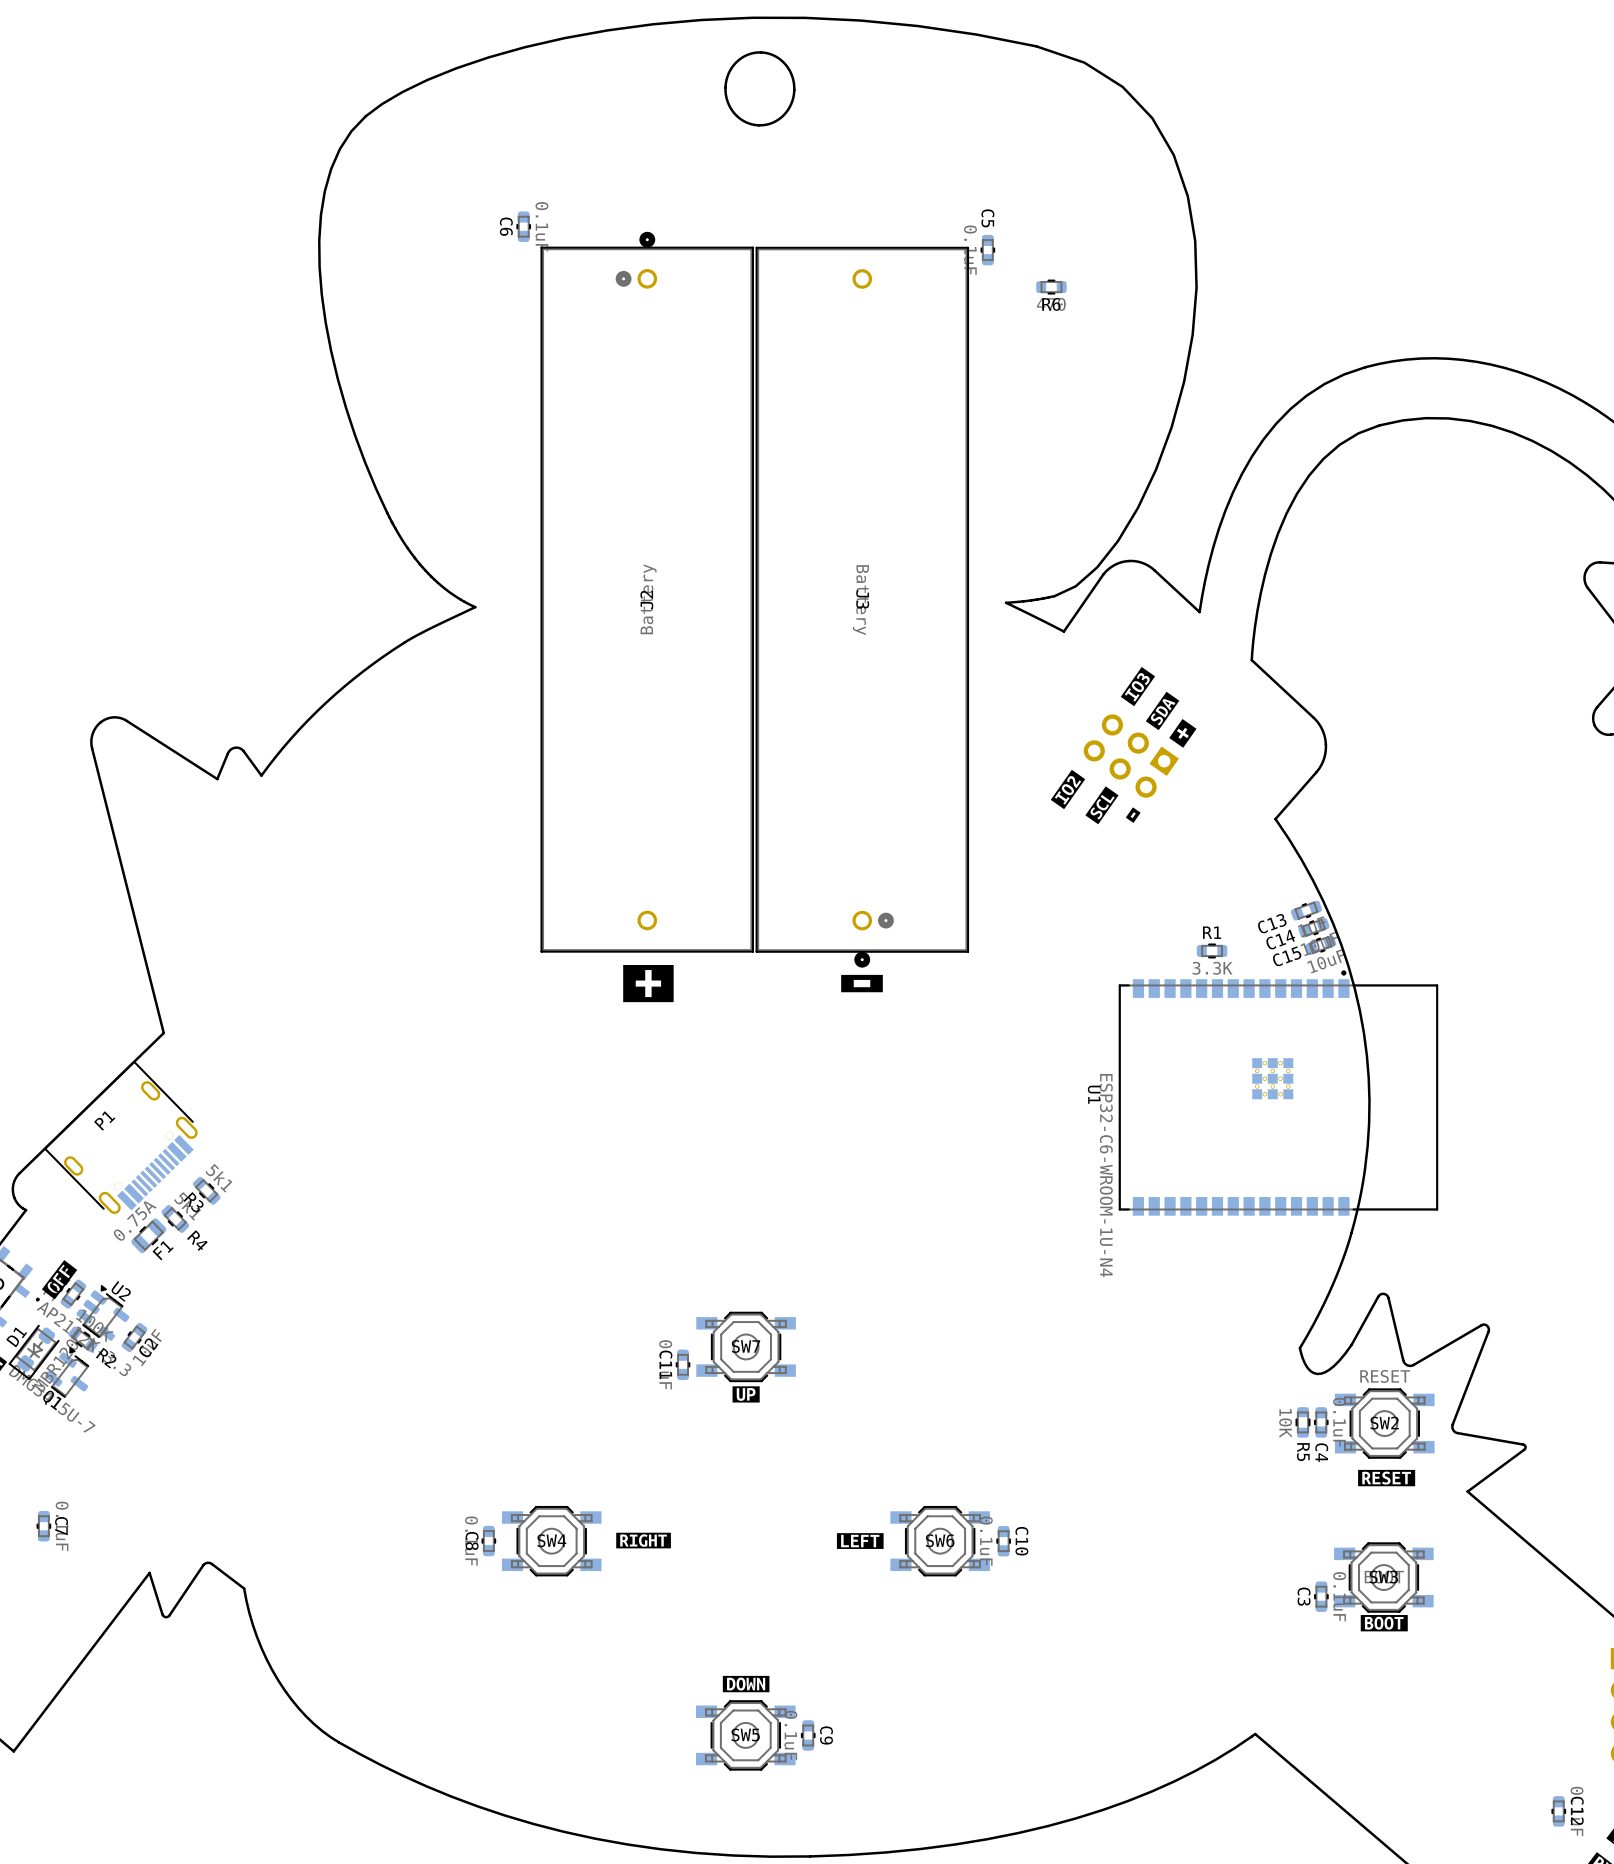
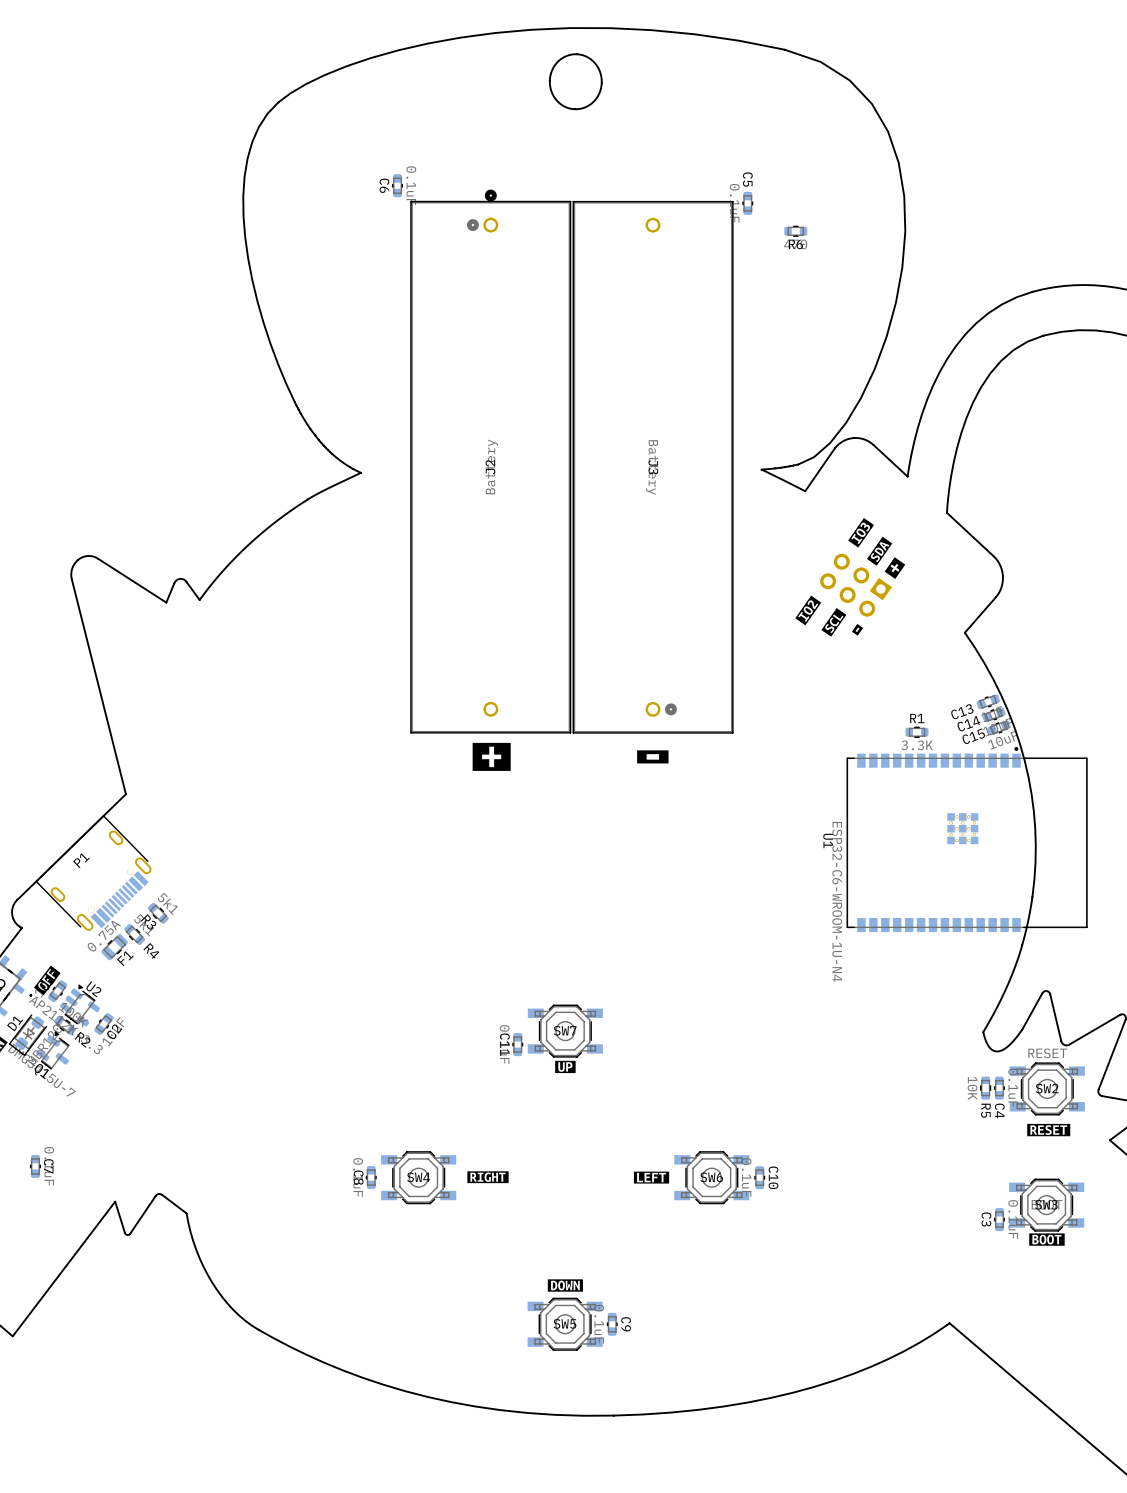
J3 footprint: [755, 246, 970, 968] -> [572, 200, 734, 734]

